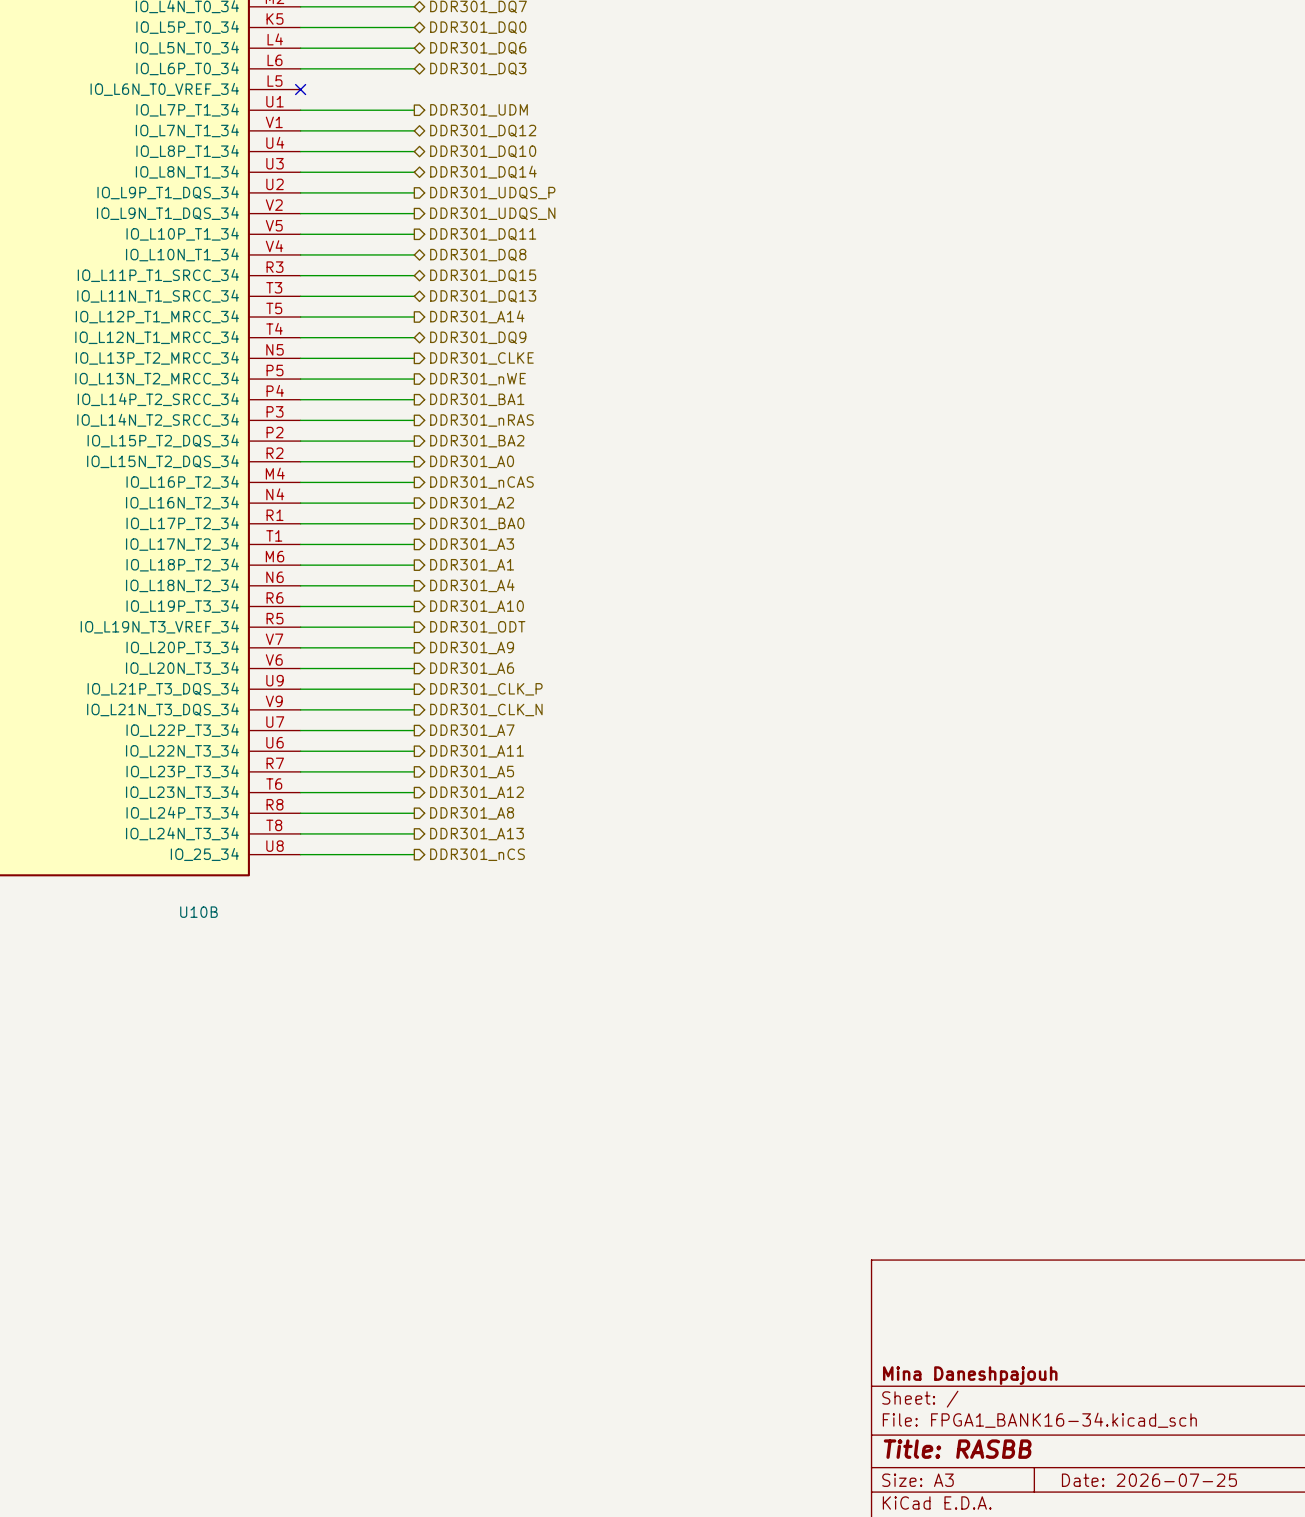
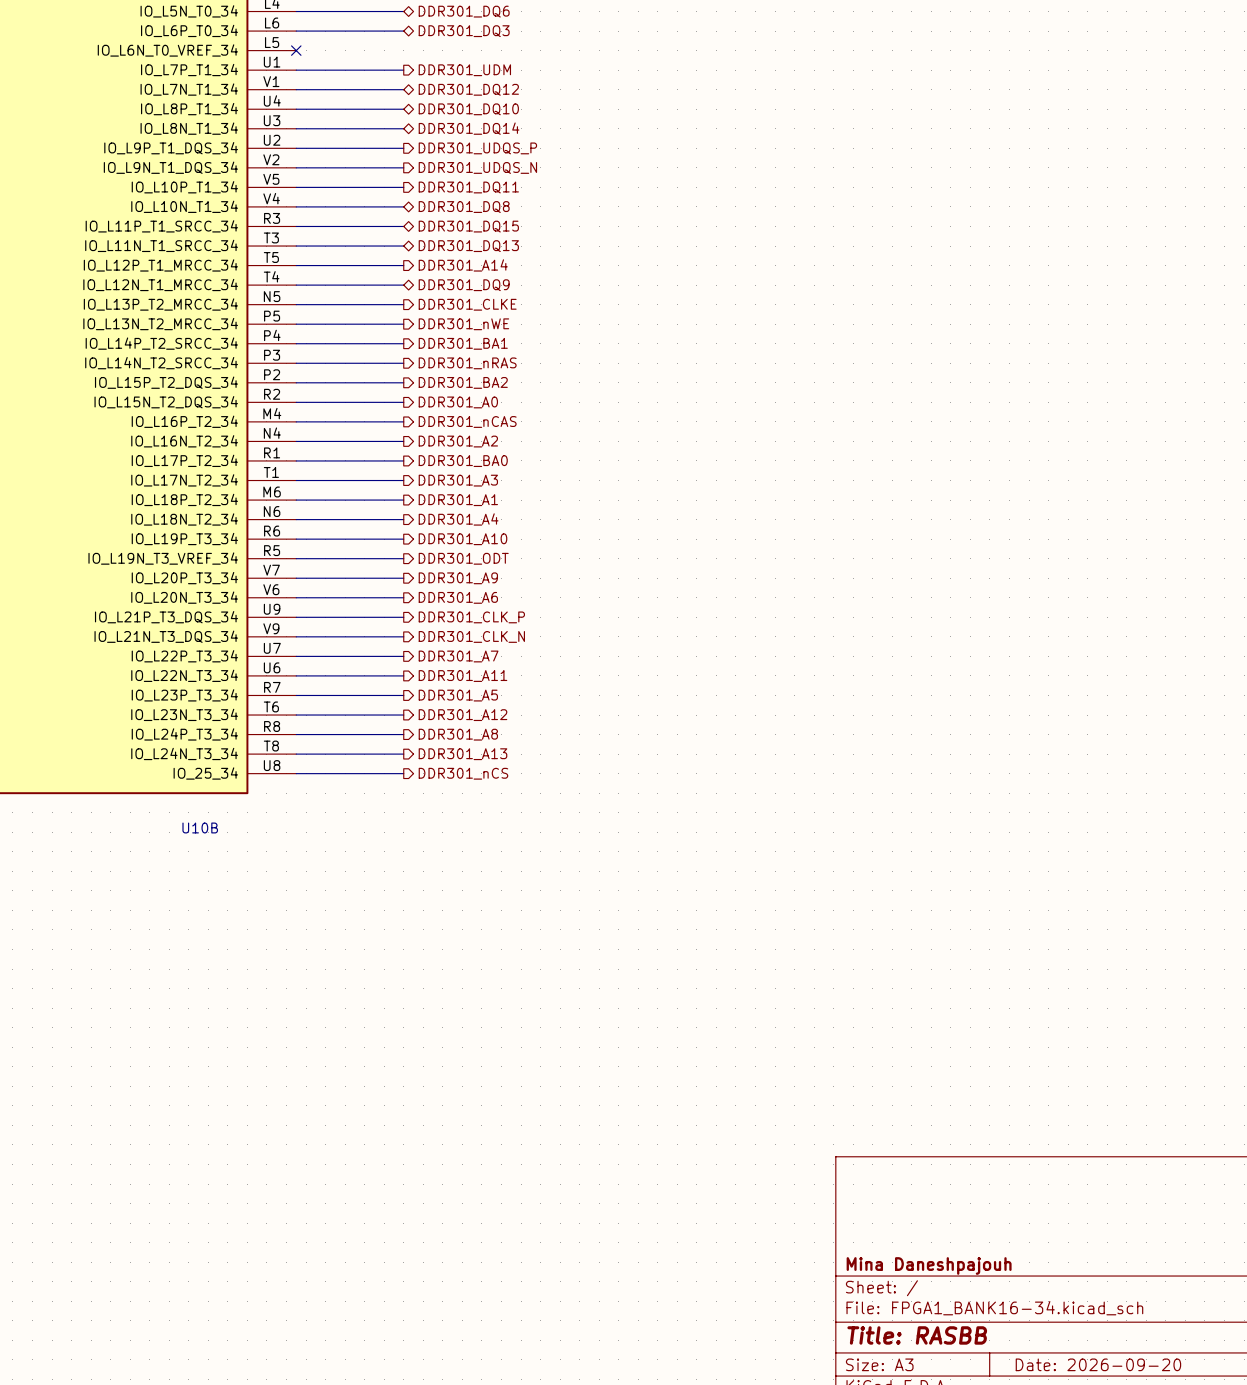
title block: Date: 2026-07-25 (1149, 1480) -> Date: 2026-09-20 (1098, 1364)

